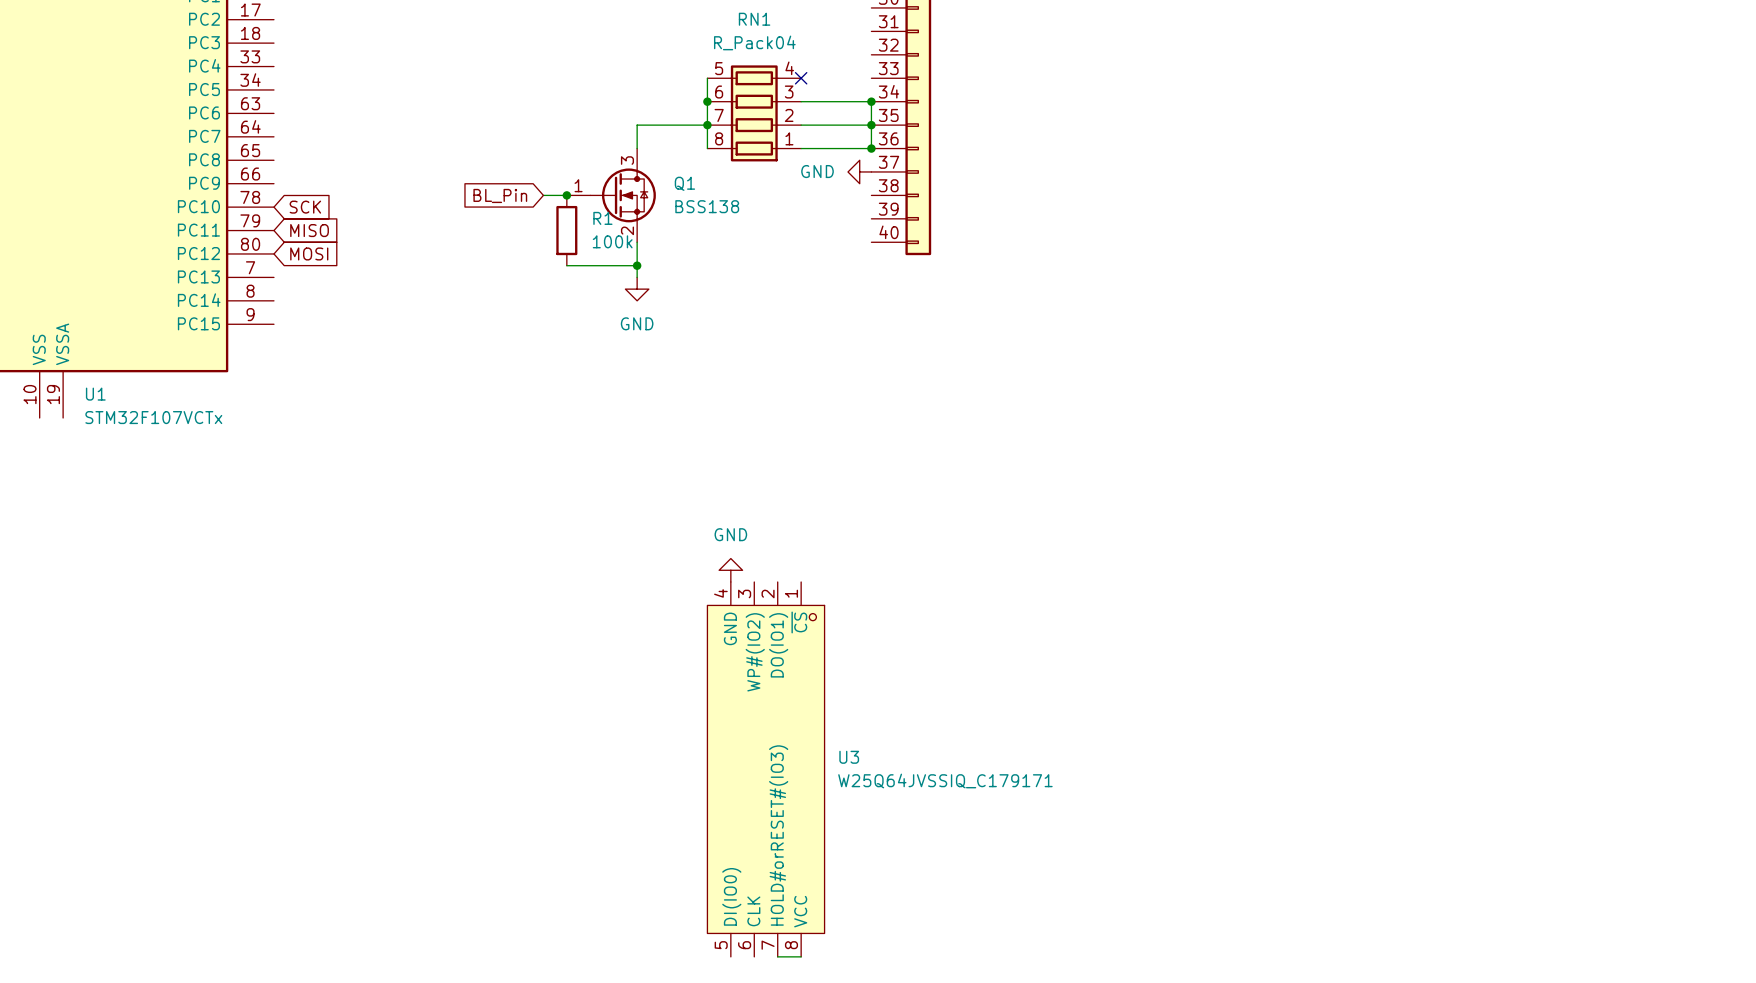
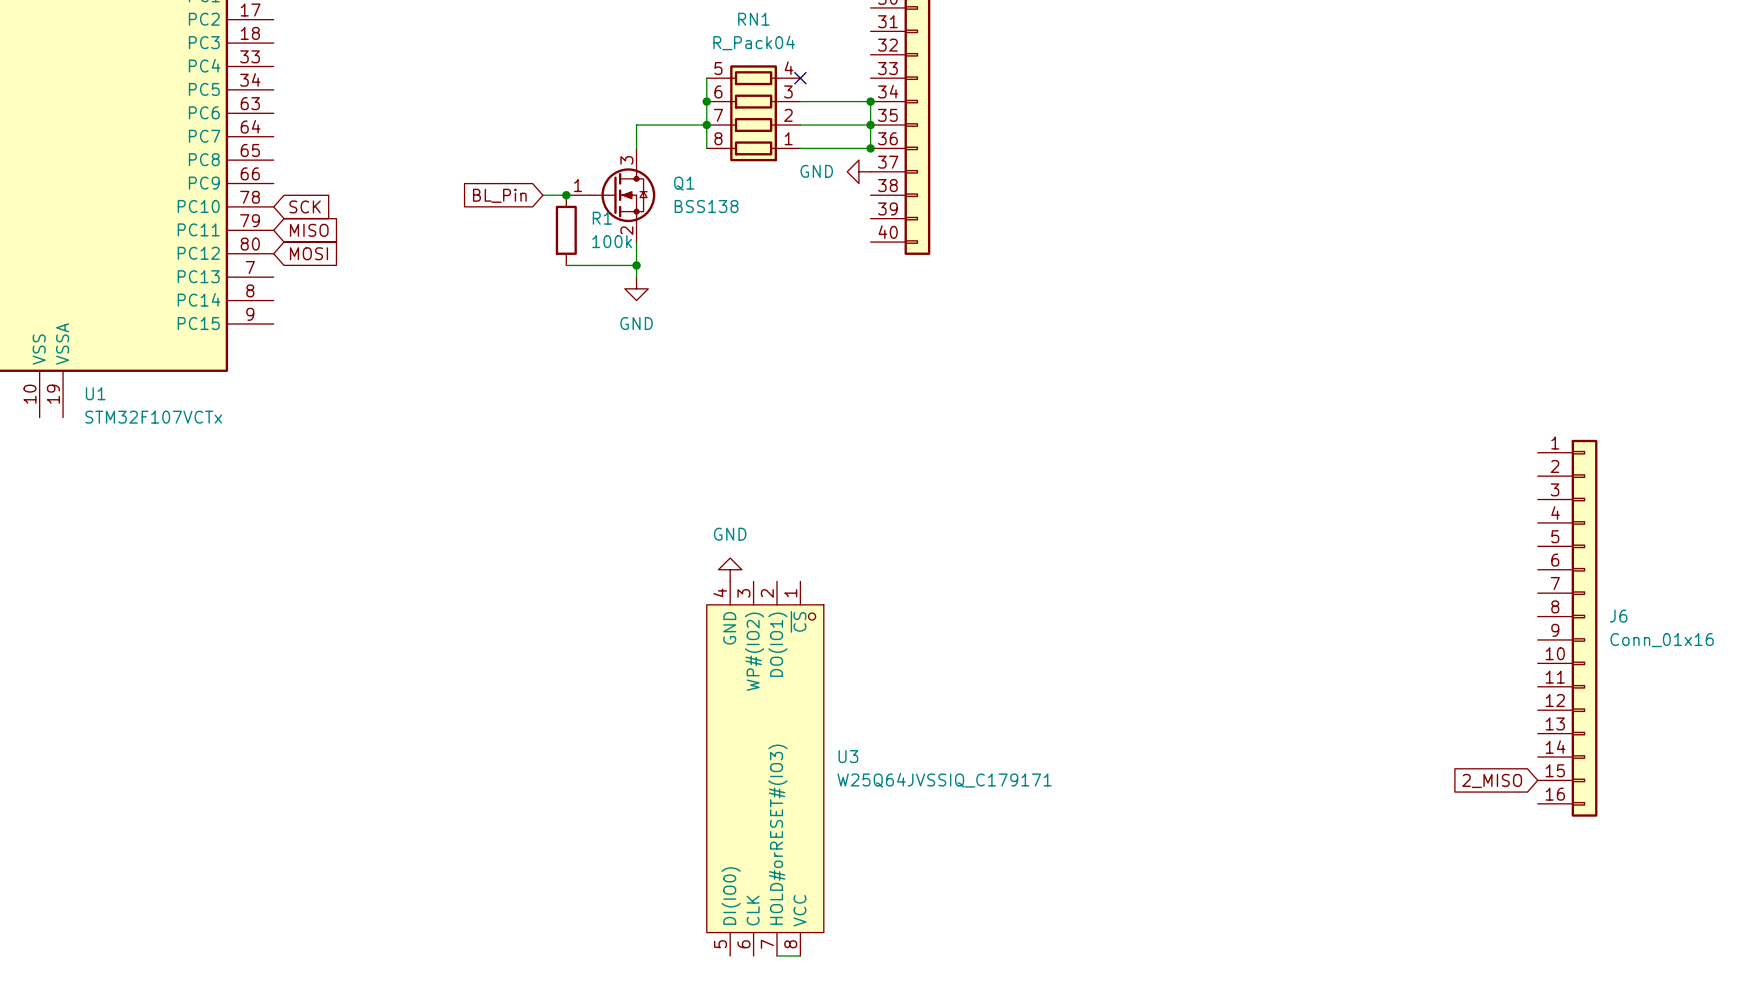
J6: none -> Conn_01x16 (1567, 628)
global label: none -> 2_MISO (1492, 780)

